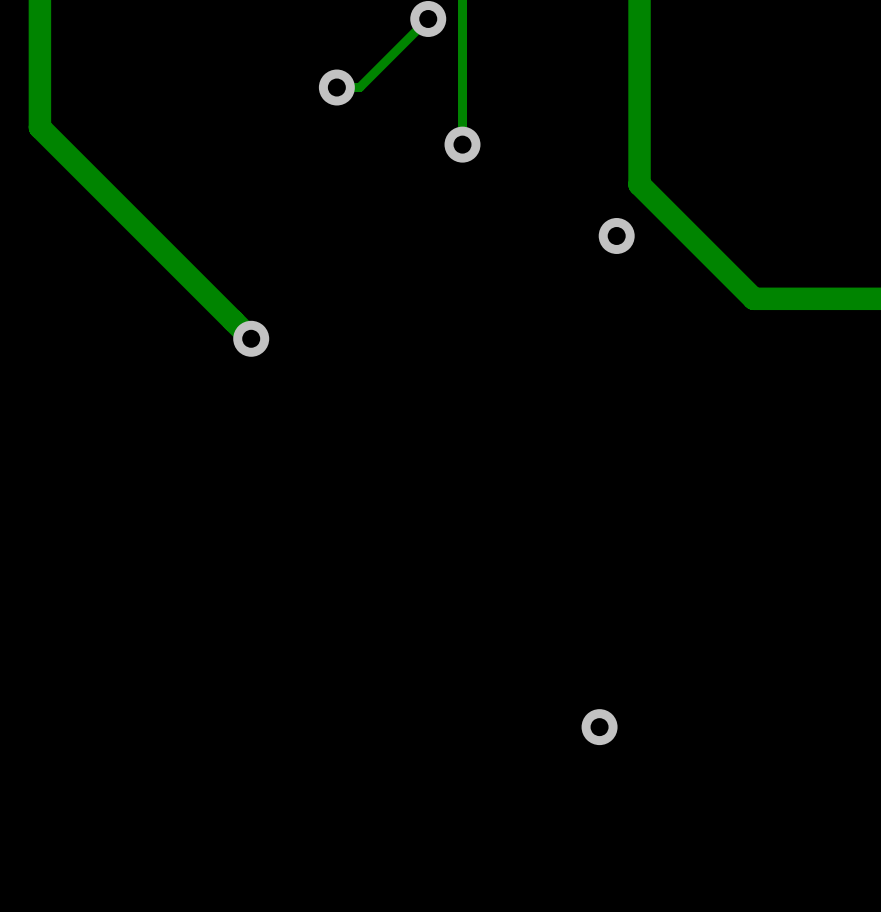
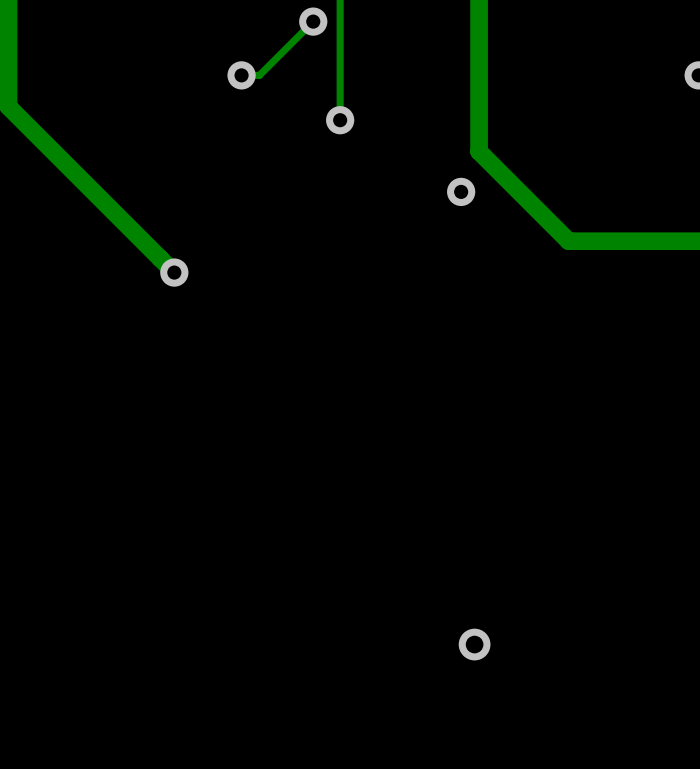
via: (599, 727) -> none
via: none -> (474, 644)

